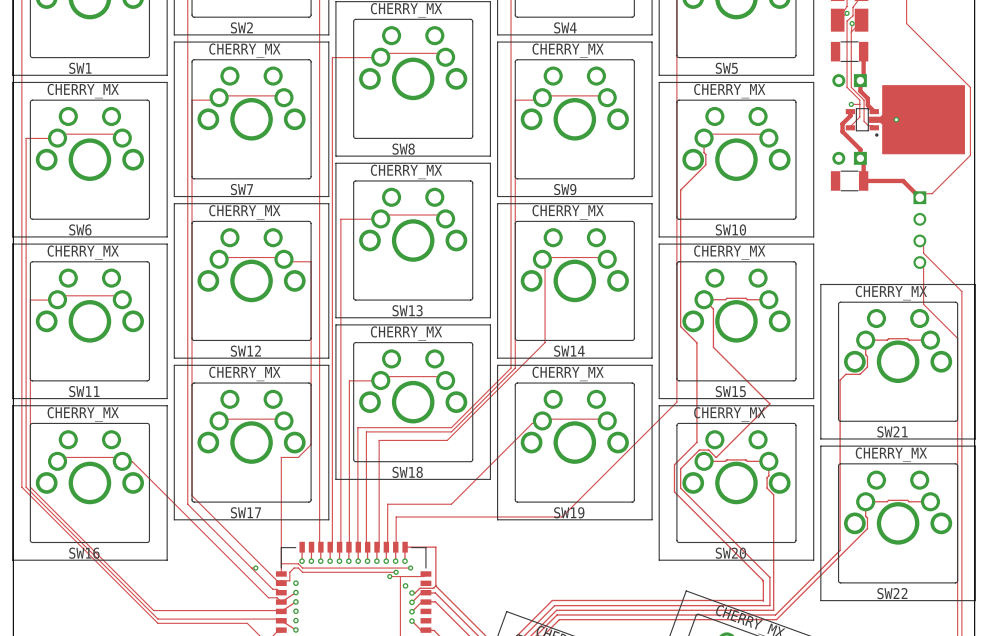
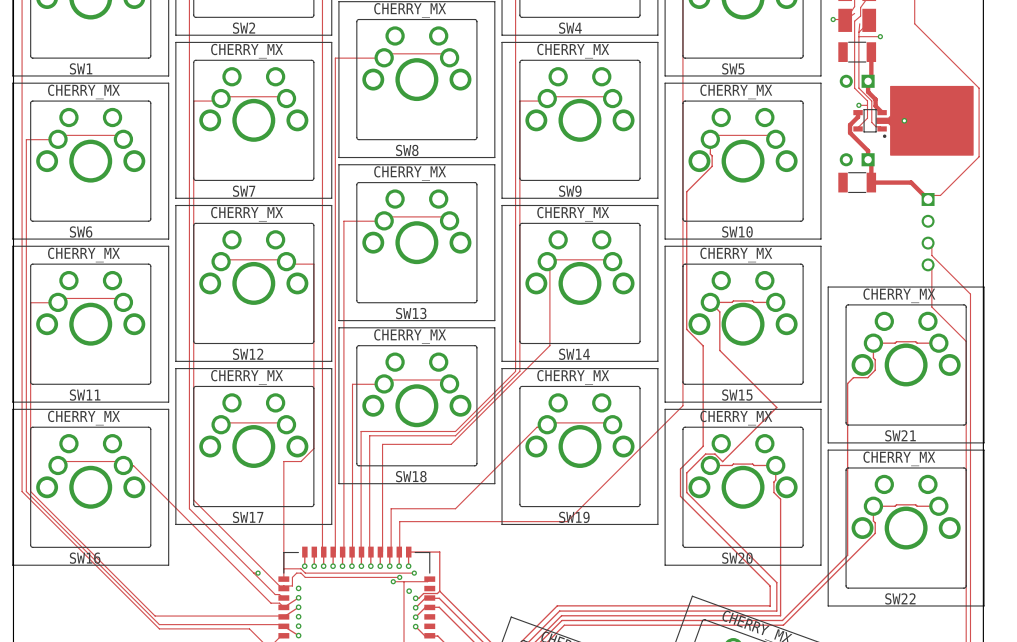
via: (847, 13) -> none
track: none -> (833, 19) (841, 19)
via: none -> (833, 19)
via: (852, 23) -> none
track: none -> (858, 36) (880, 36)
via: none -> (880, 36)

